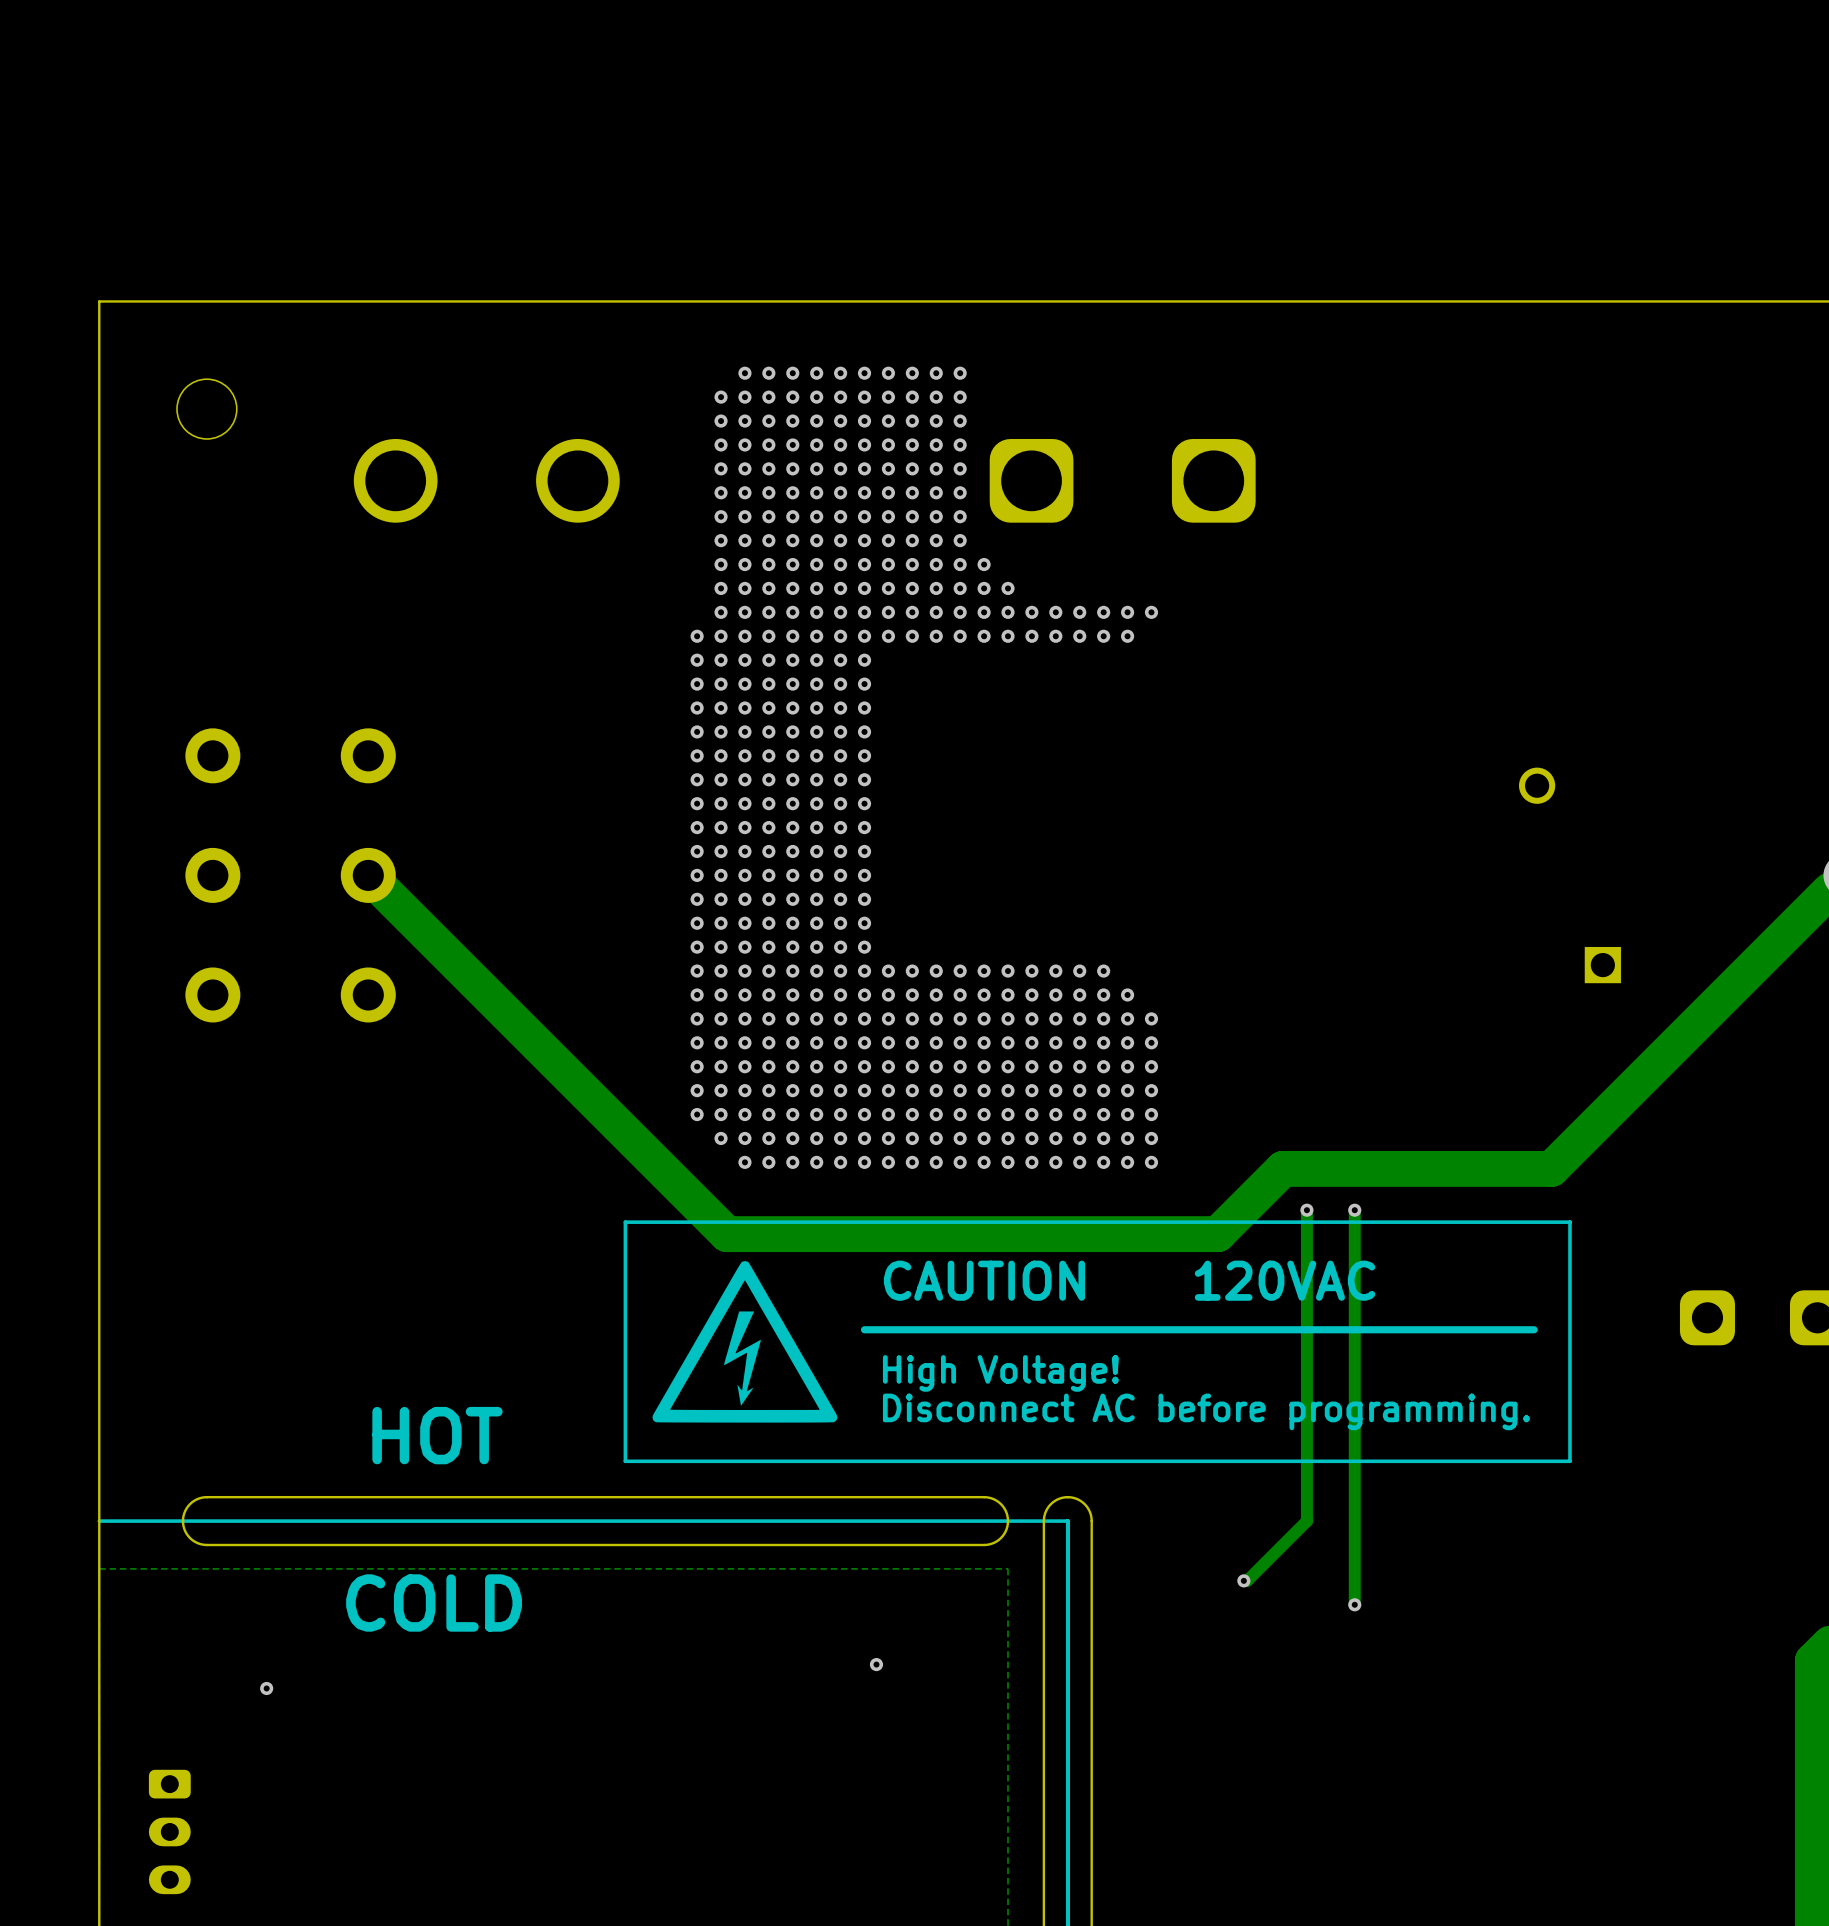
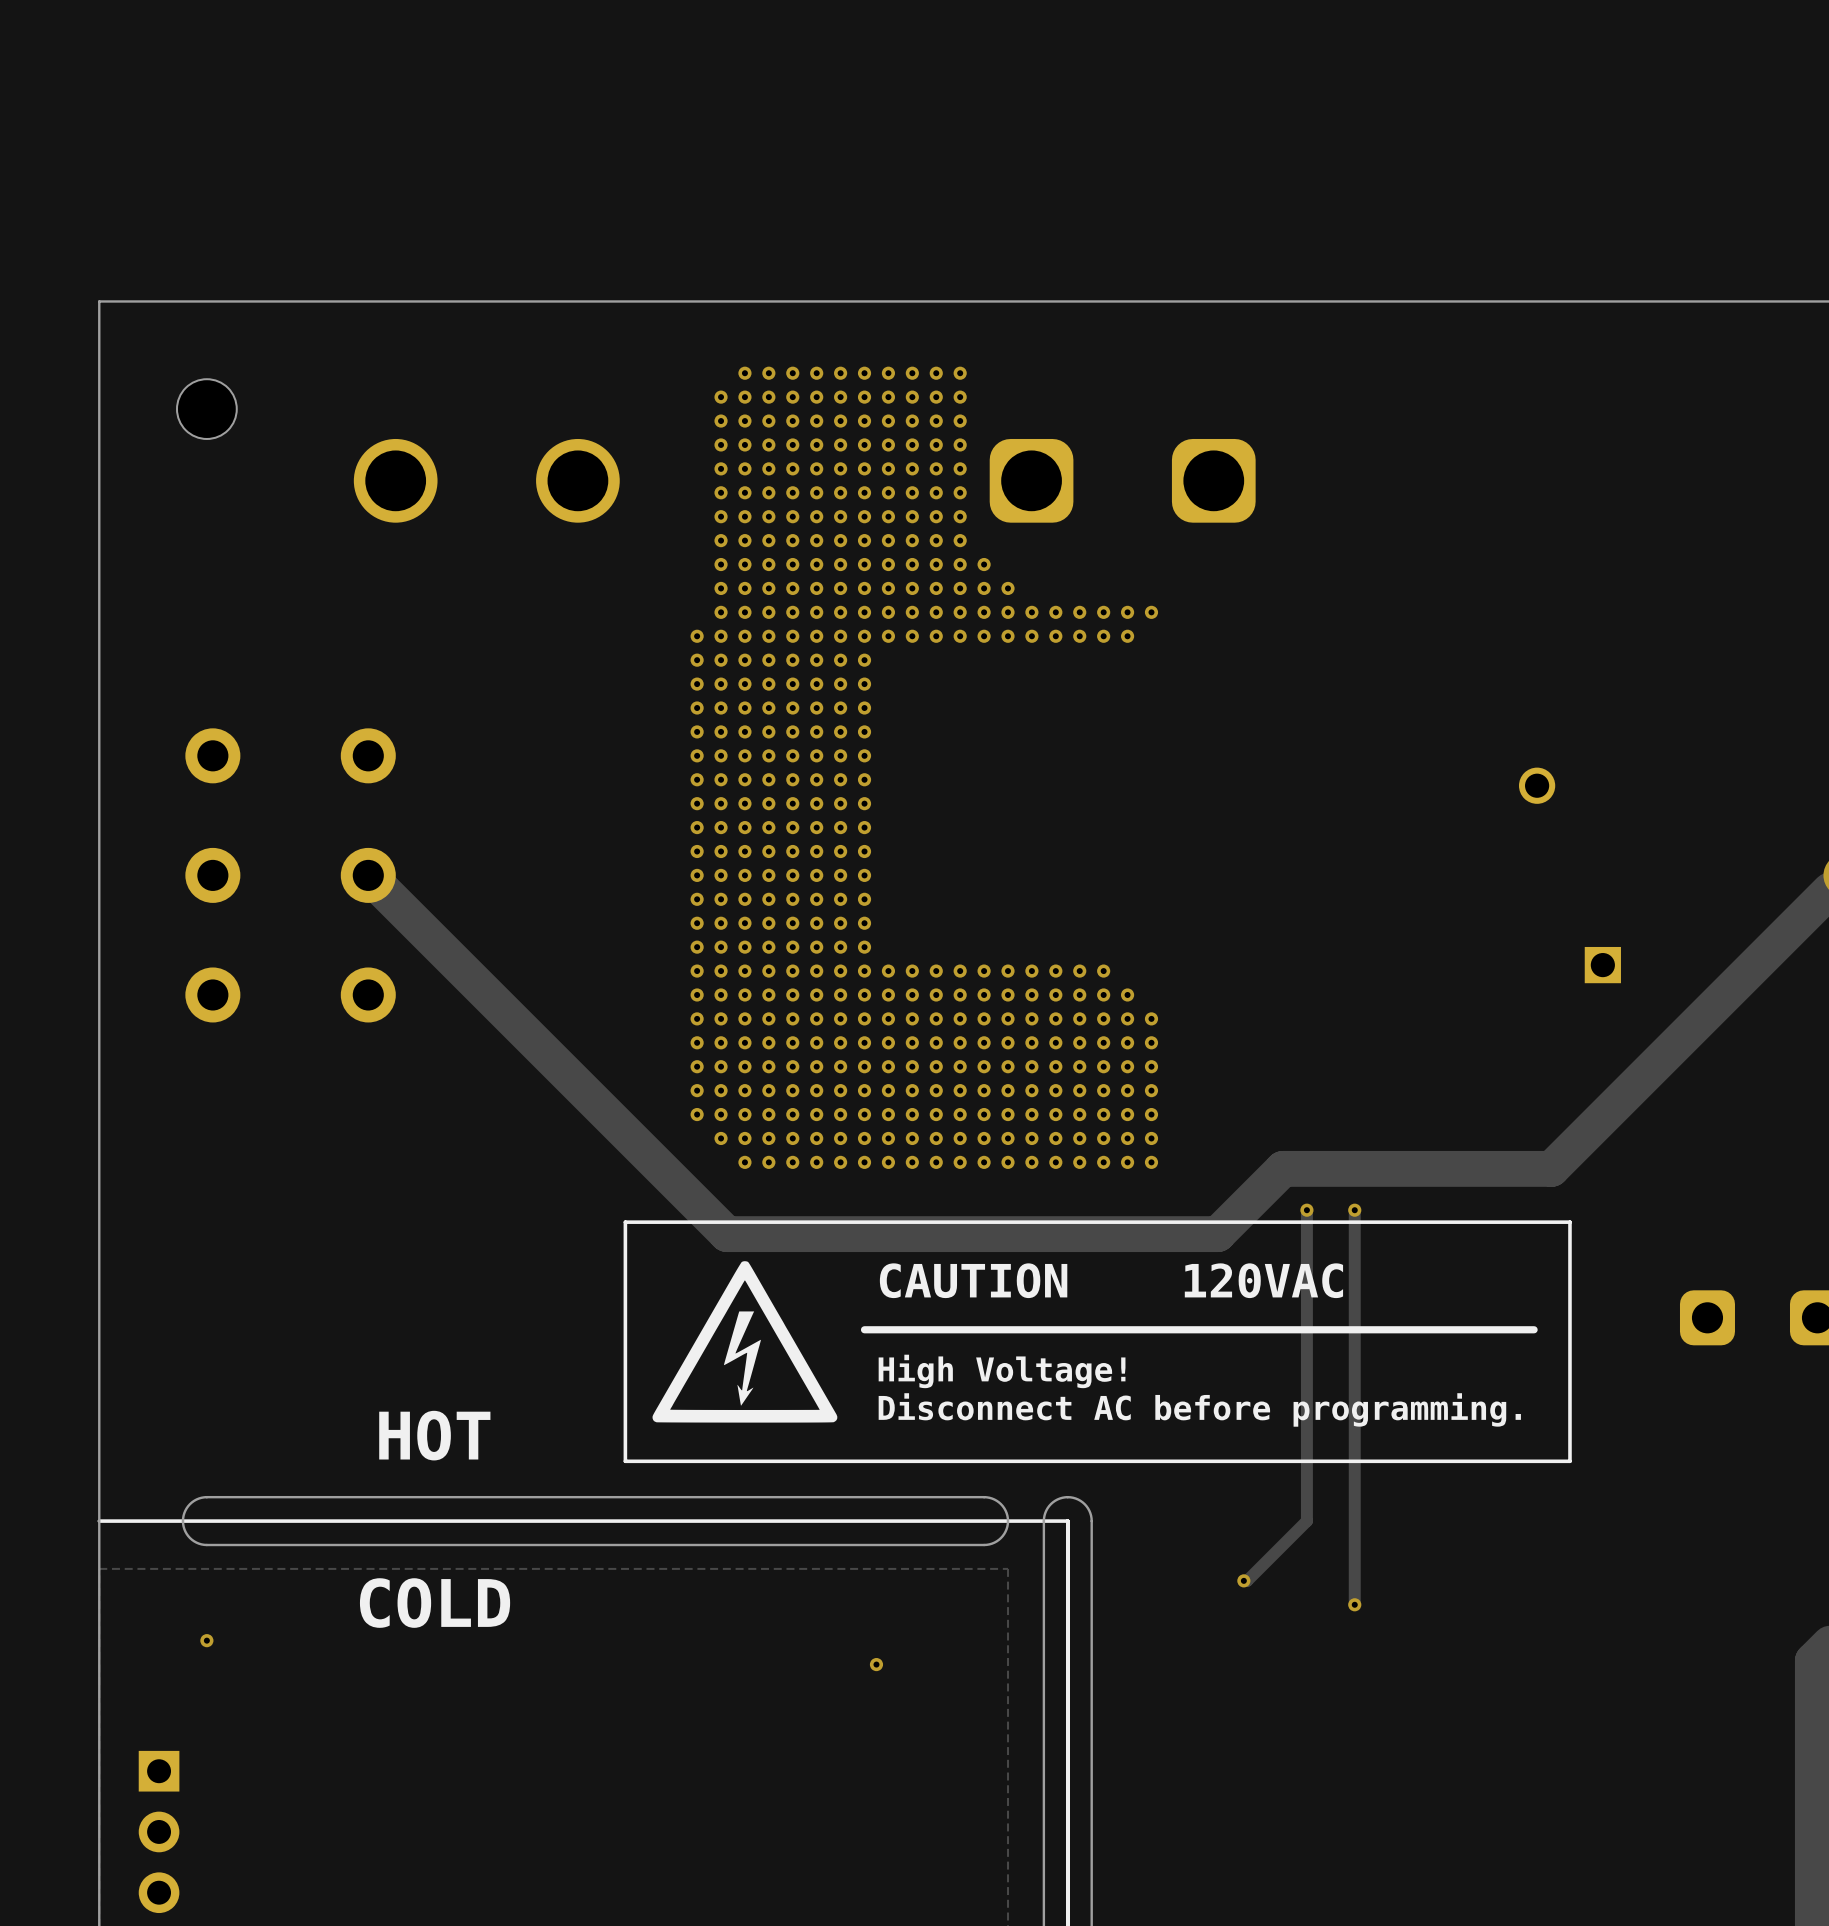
via position: (266, 1688) -> (206, 1640)
part footprint: [148, 1769, 191, 1895] -> [138, 1750, 180, 1914]

